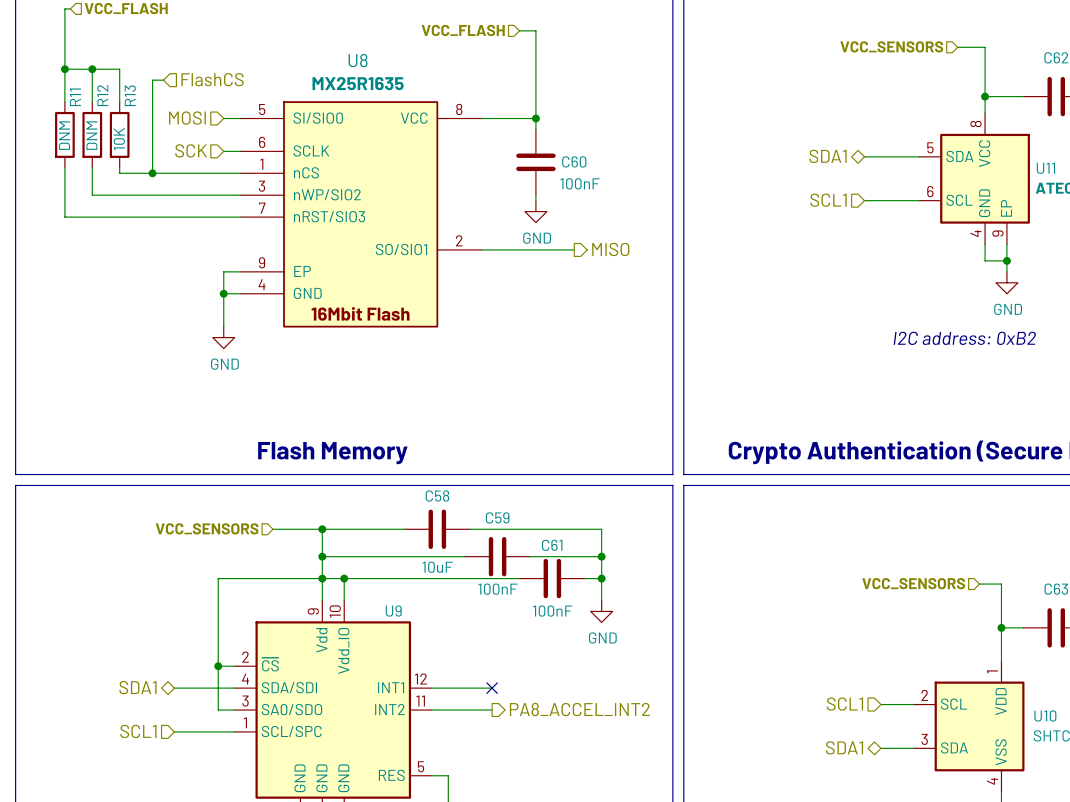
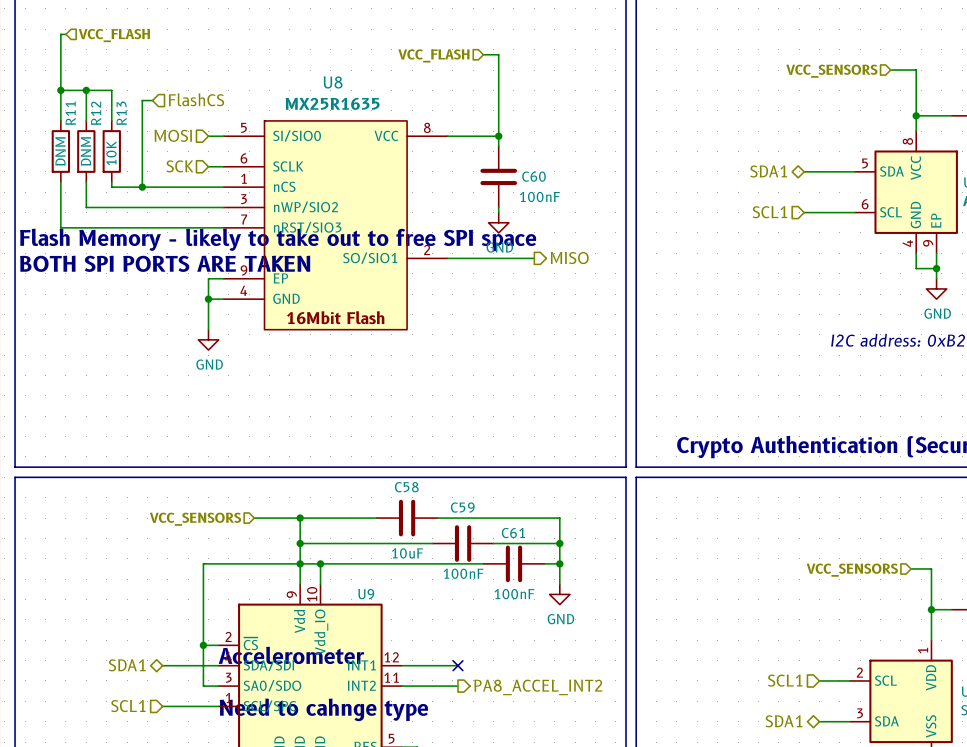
text: none -> Flash Memory - likely to take out to free SPI space (278, 239)
text: none -> BOTH SPI PORTS ARE TAKEN (165, 263)
text: Flash Memory (332, 453) -> none
text: none -> Accelerometer (291, 655)
text: none -> Need to cahnge type (323, 709)

